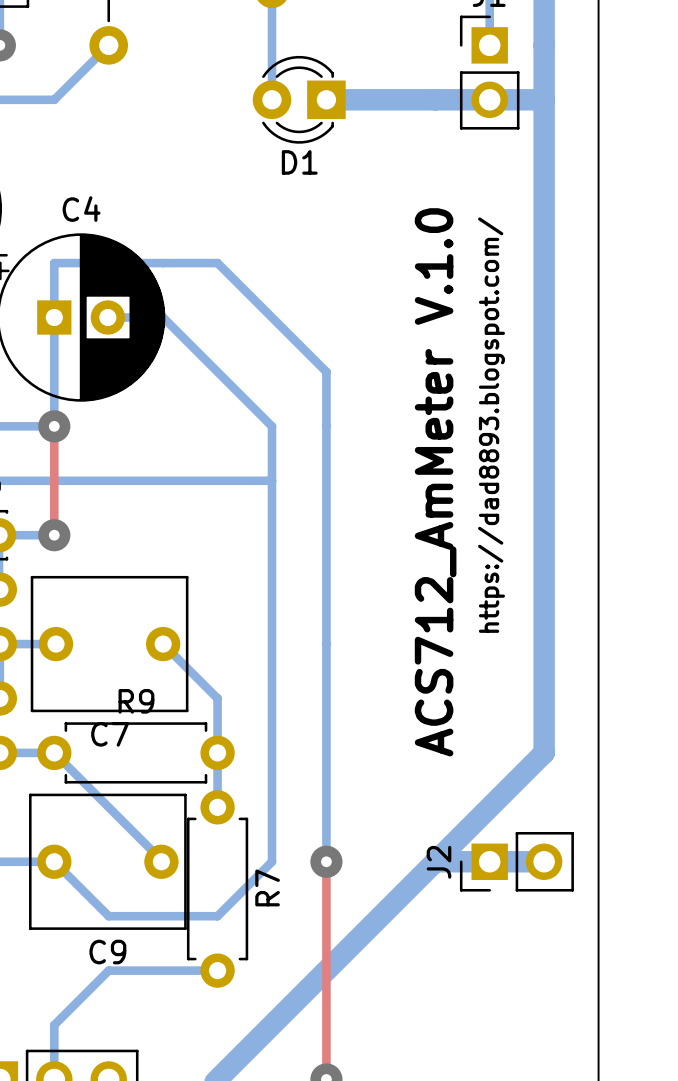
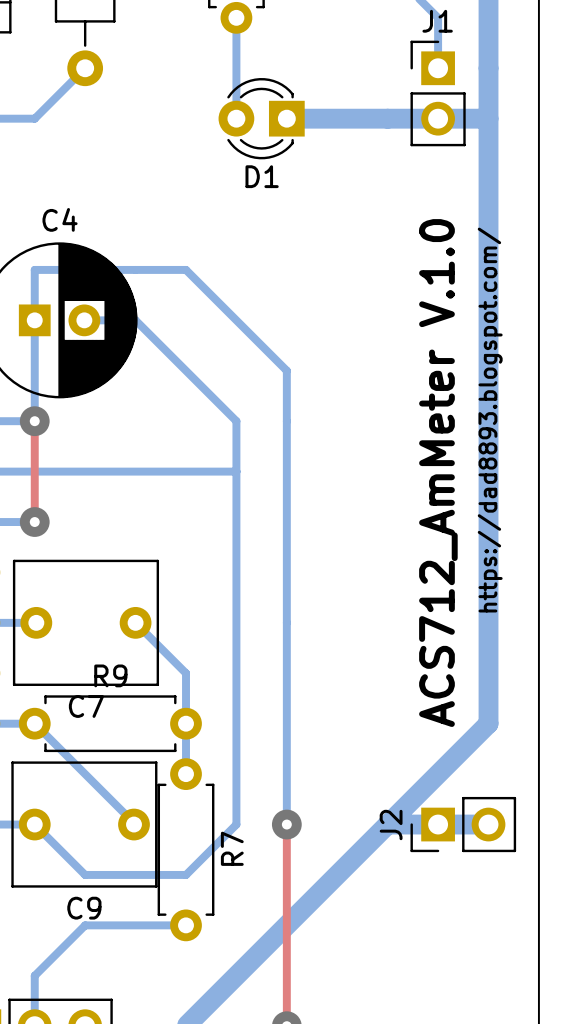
text position: https://dad8893.blogspot.com/ (491, 425) -> https://dad8893.blogspot.com/ (490, 420)
text position: ACS712_AmMeter V.1.0 (435, 482) -> ACS712_AmMeter V.1.0 (438, 473)

